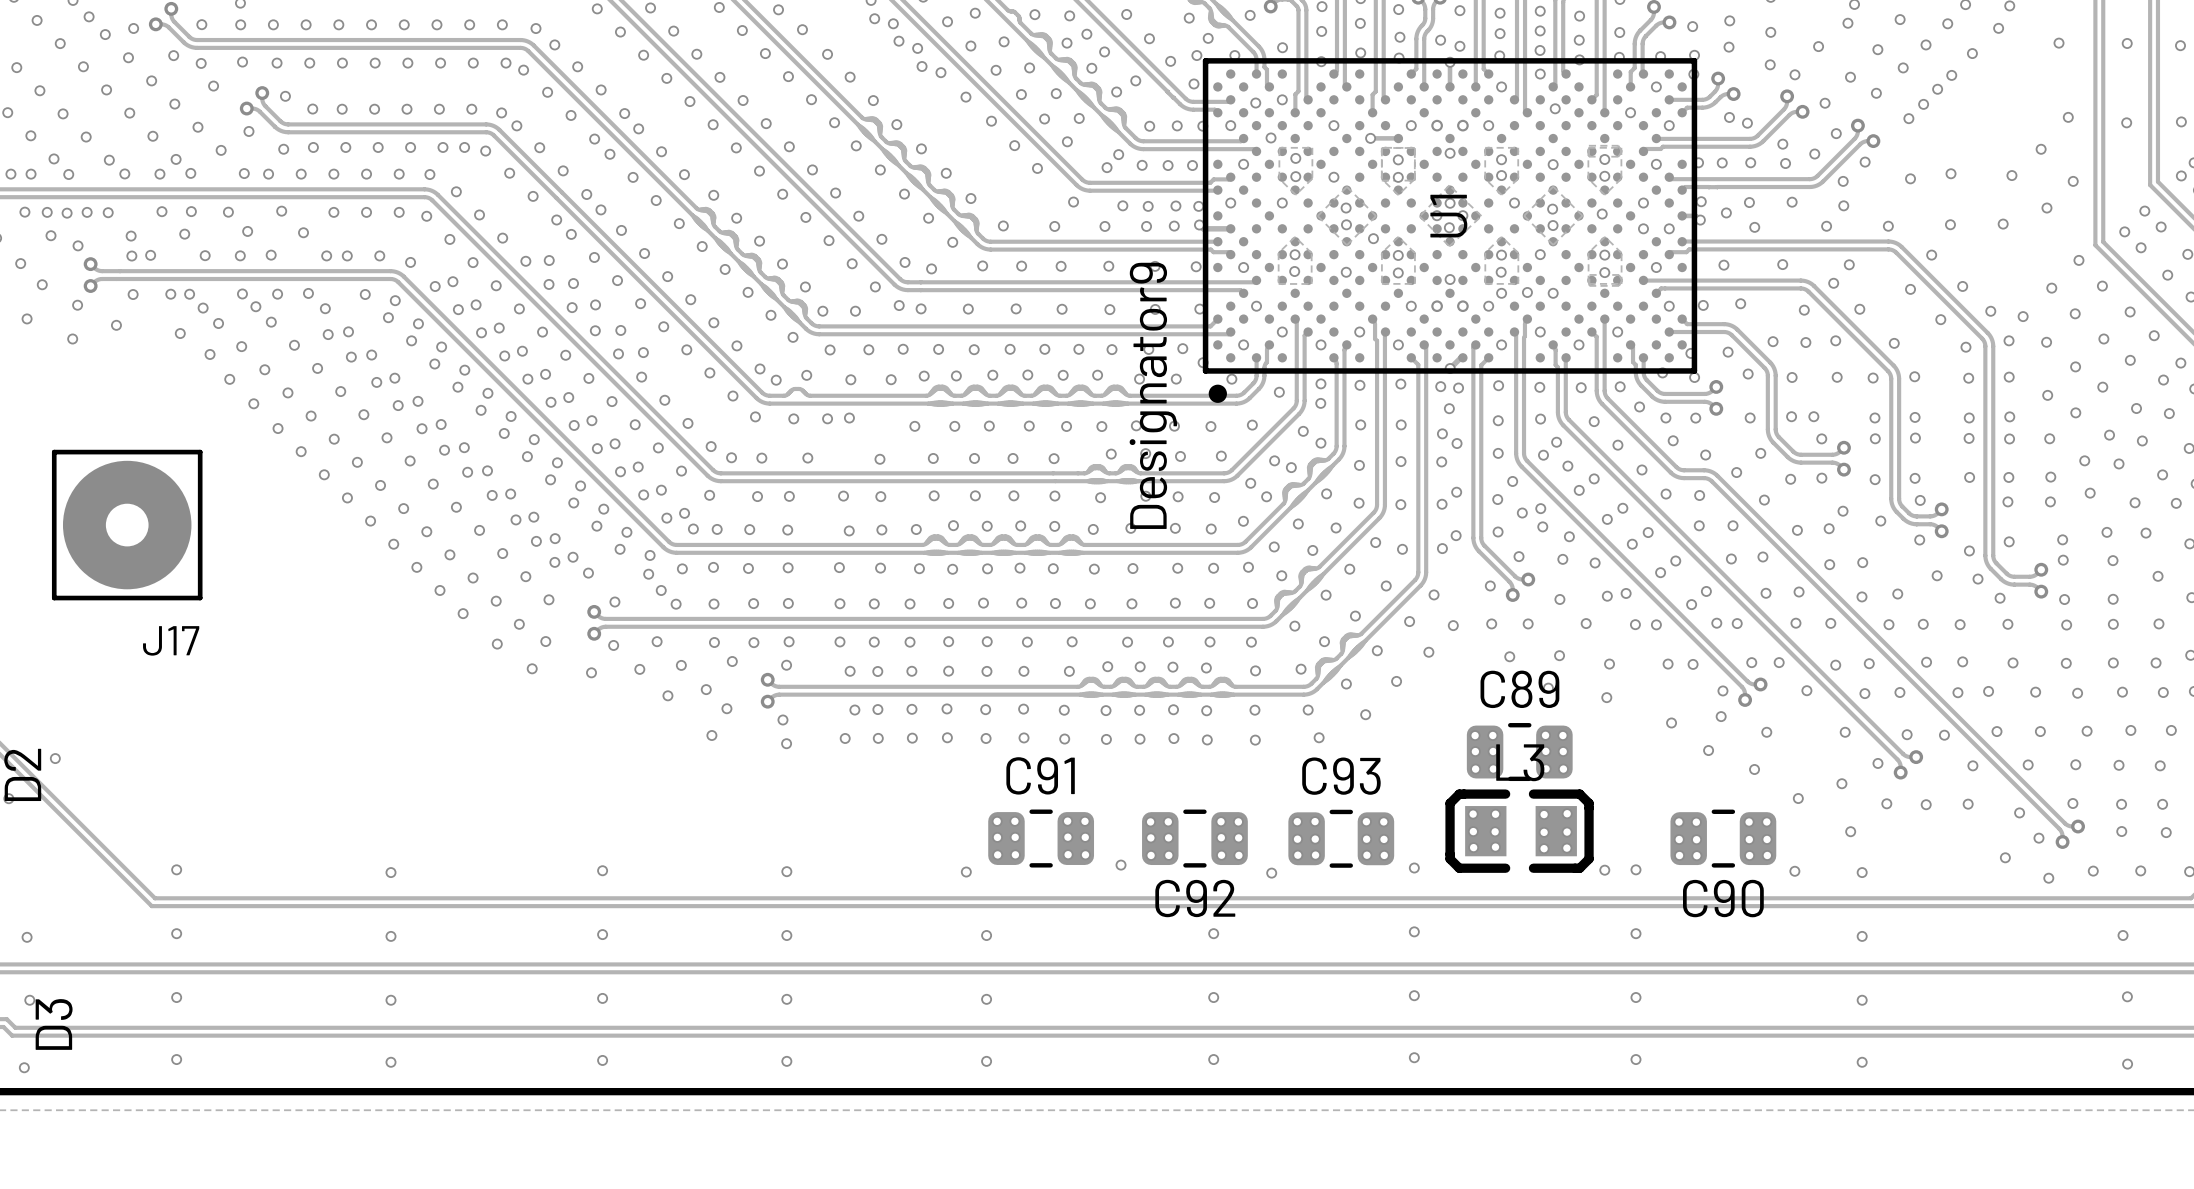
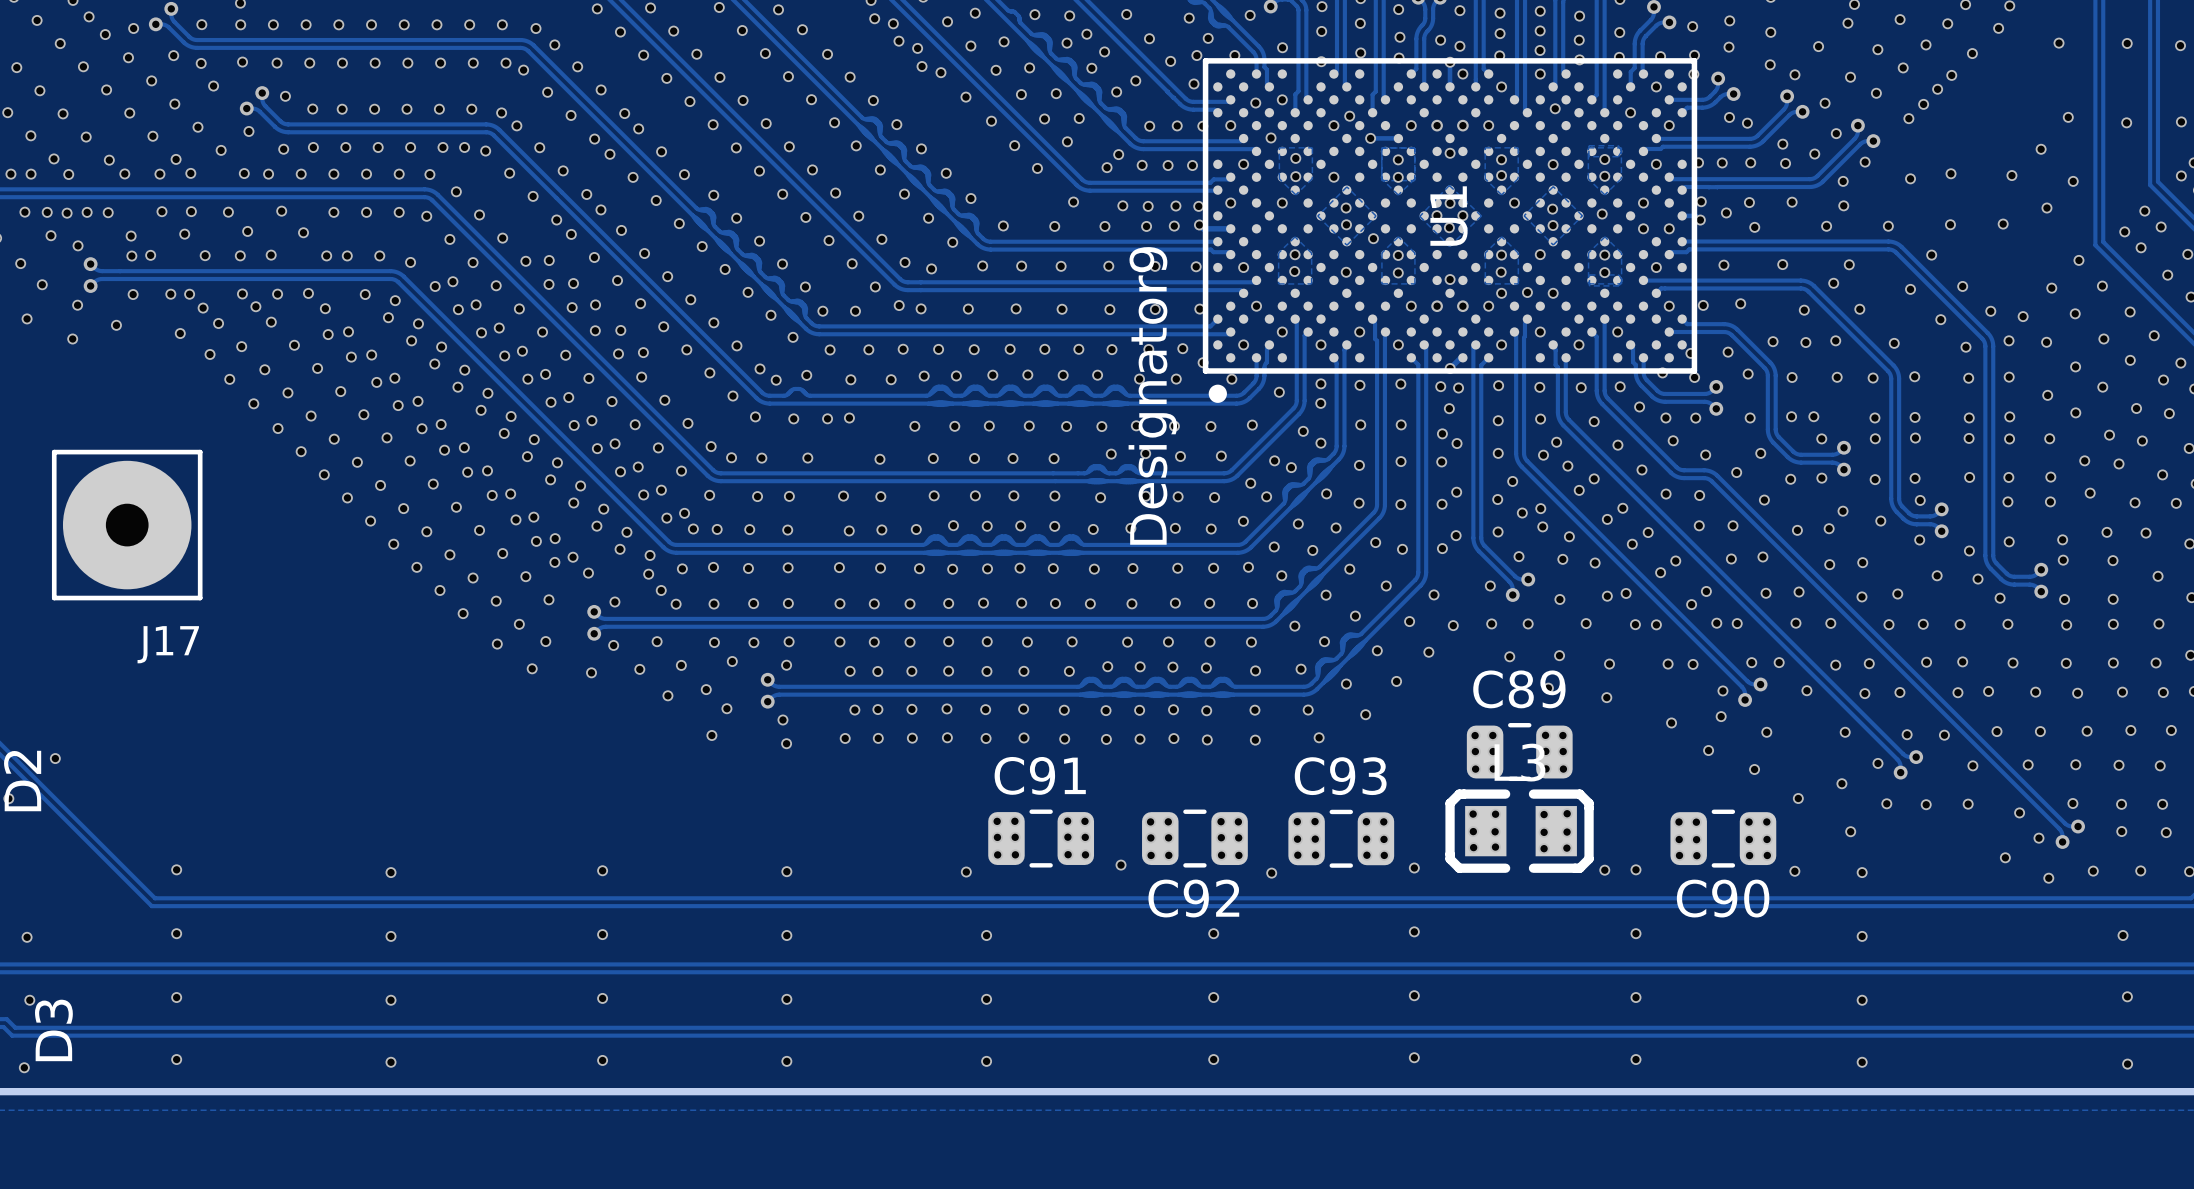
via: none -> (1462, 74)
via: none -> (1349, 116)

